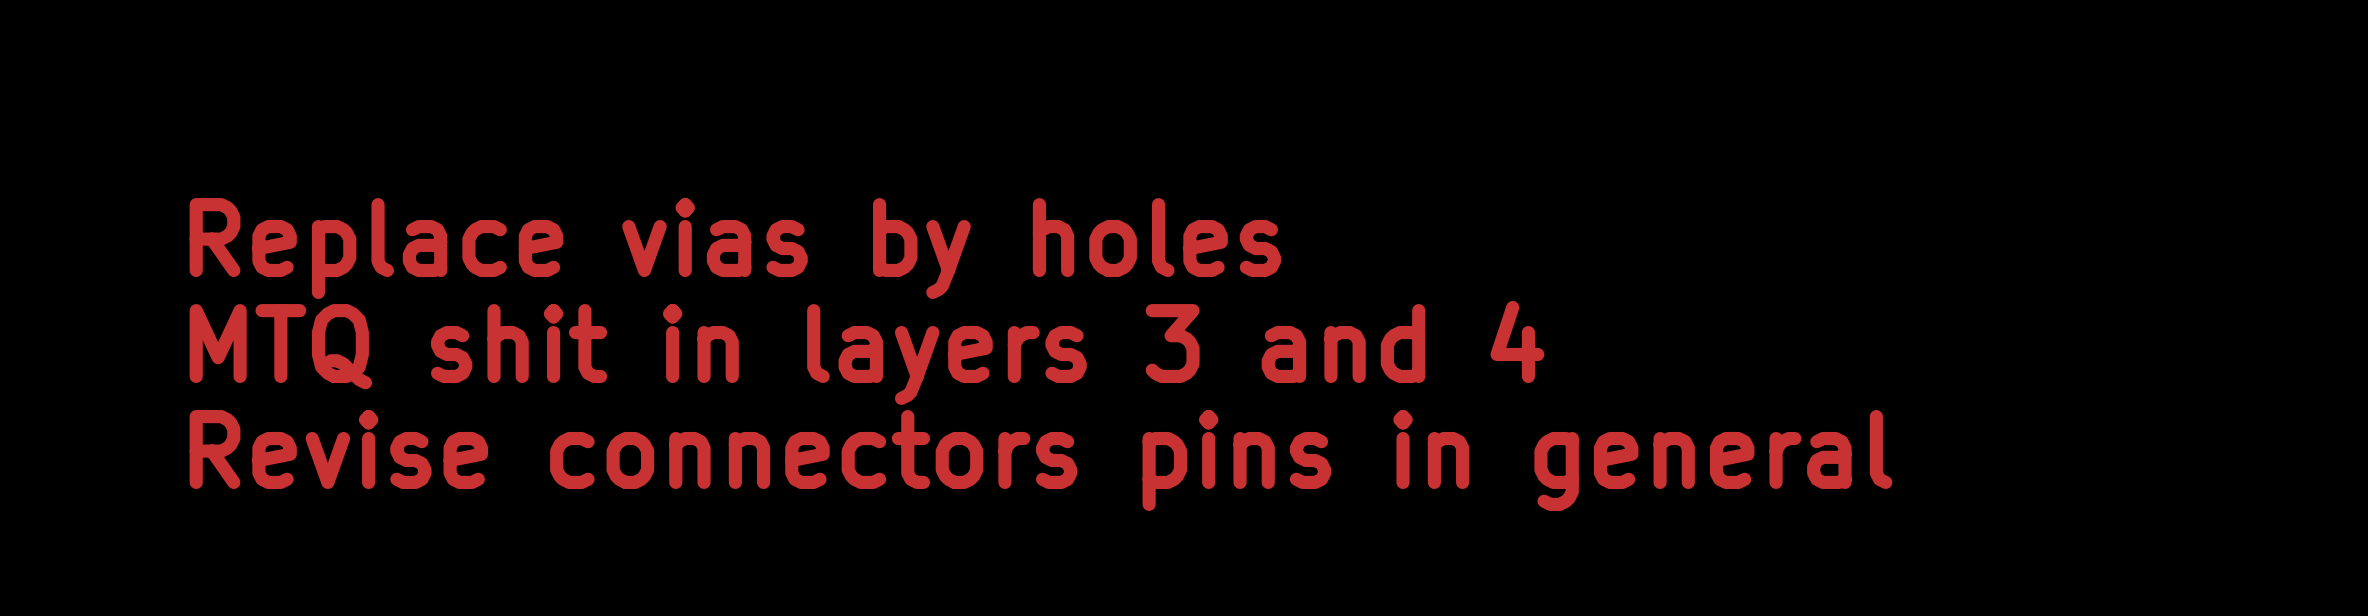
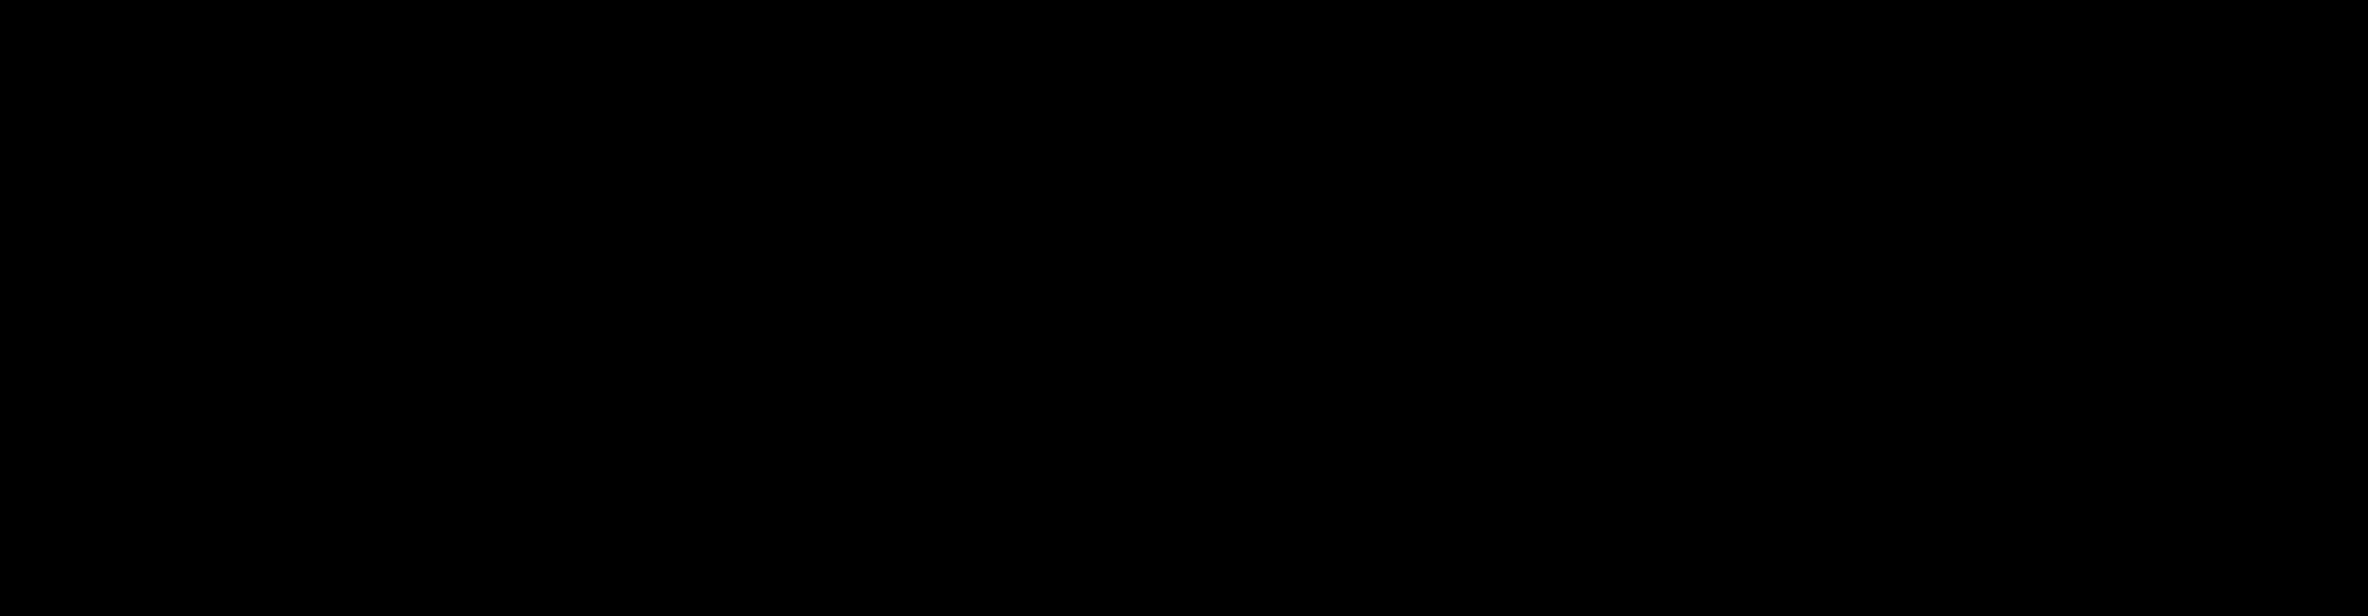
text: Replace vias by holes (735, 248) -> none
text: MTQ shit in layers 3 and 4 (867, 352) -> none
text: Revise connectors pins in general (1040, 460) -> none

